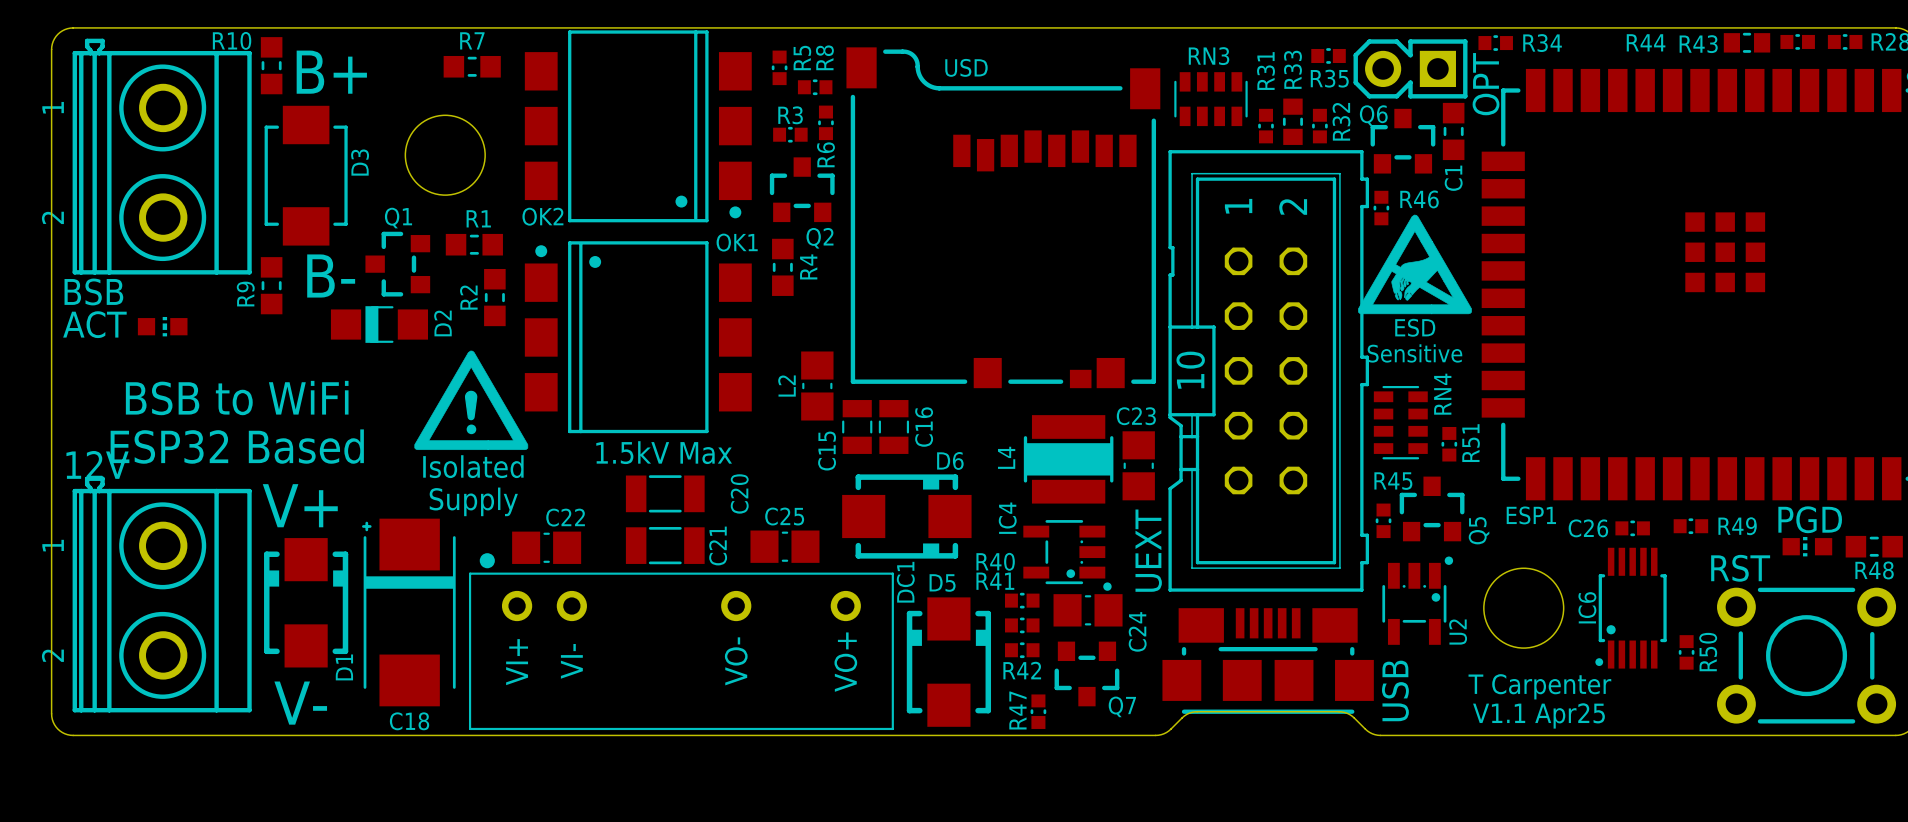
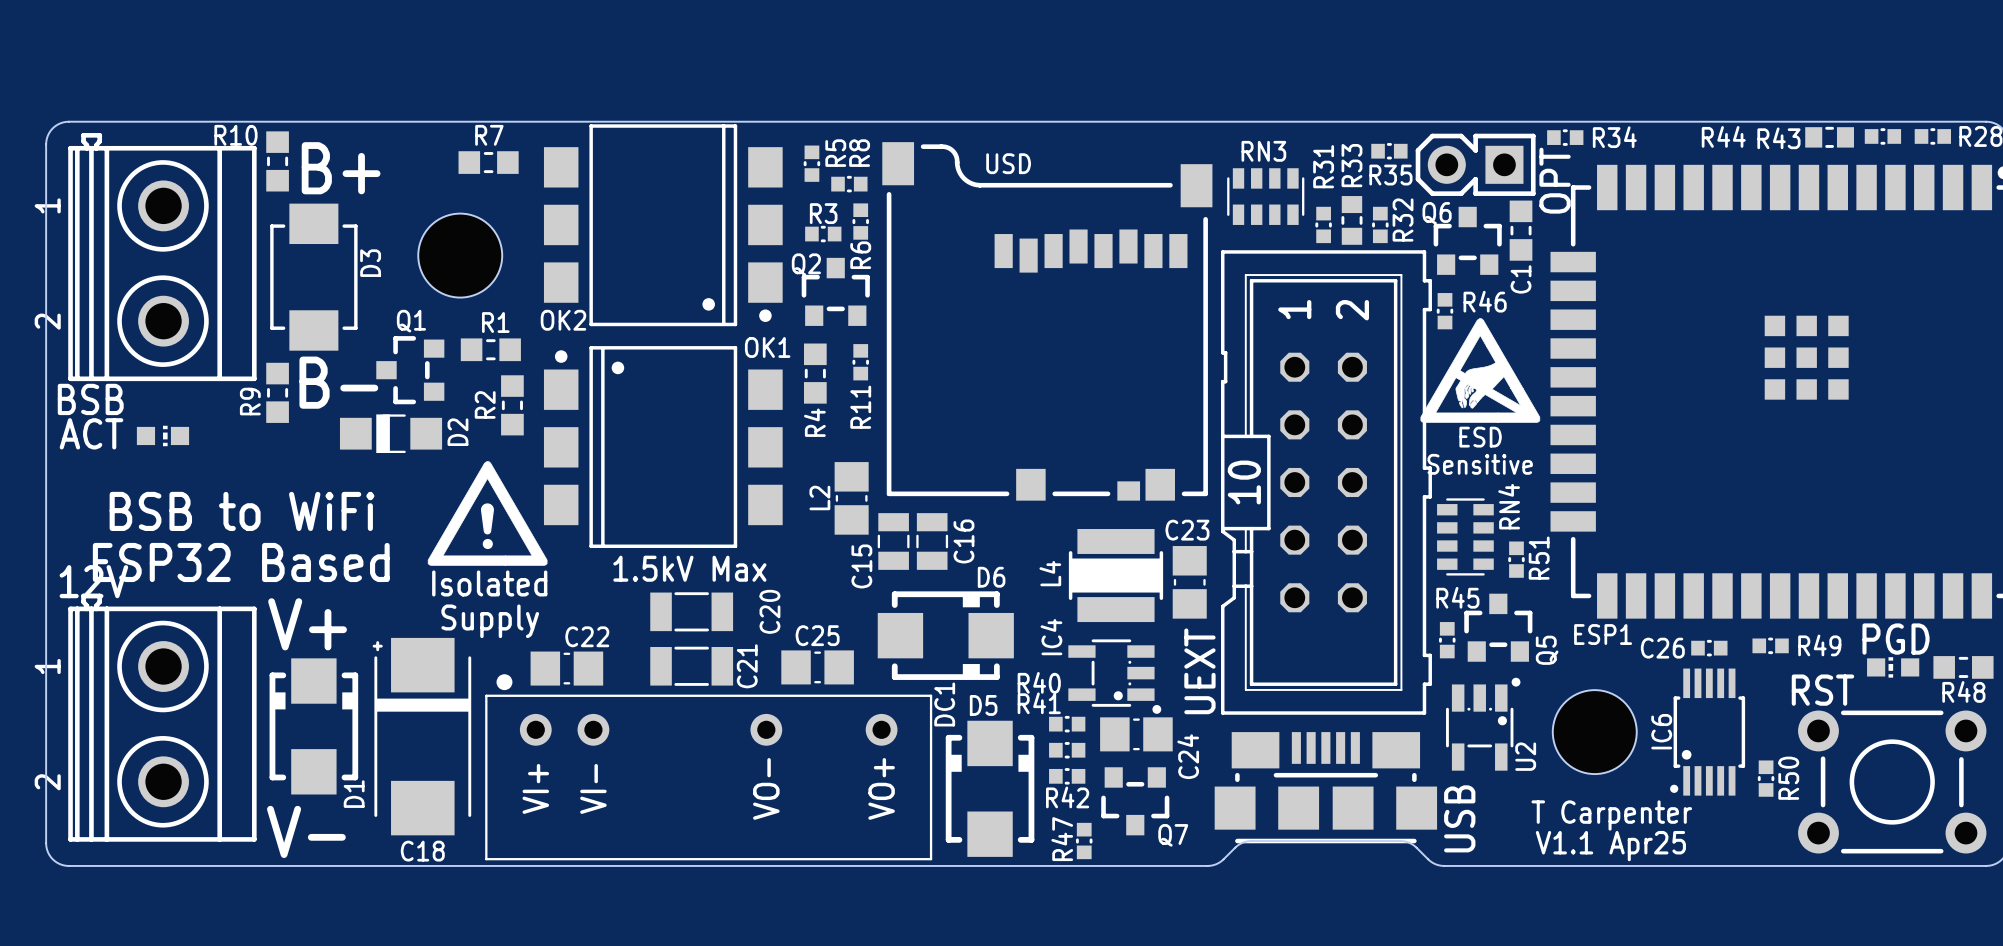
Q2 name position: Q2 (819, 238) -> Q2 (806, 264)
R11: none -> (860, 362)
R4 name position: R4 (808, 266) -> R4 (814, 422)

